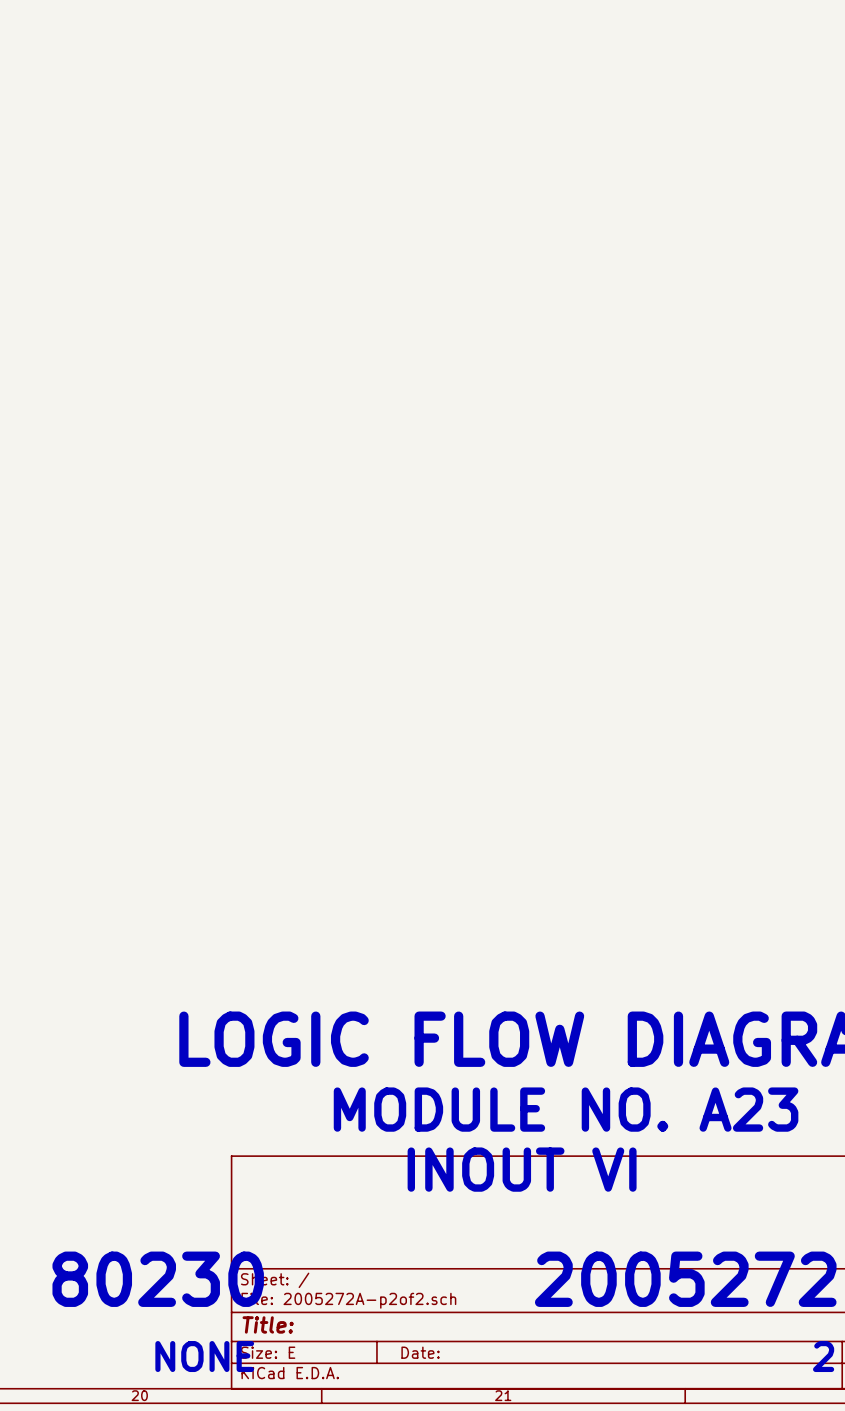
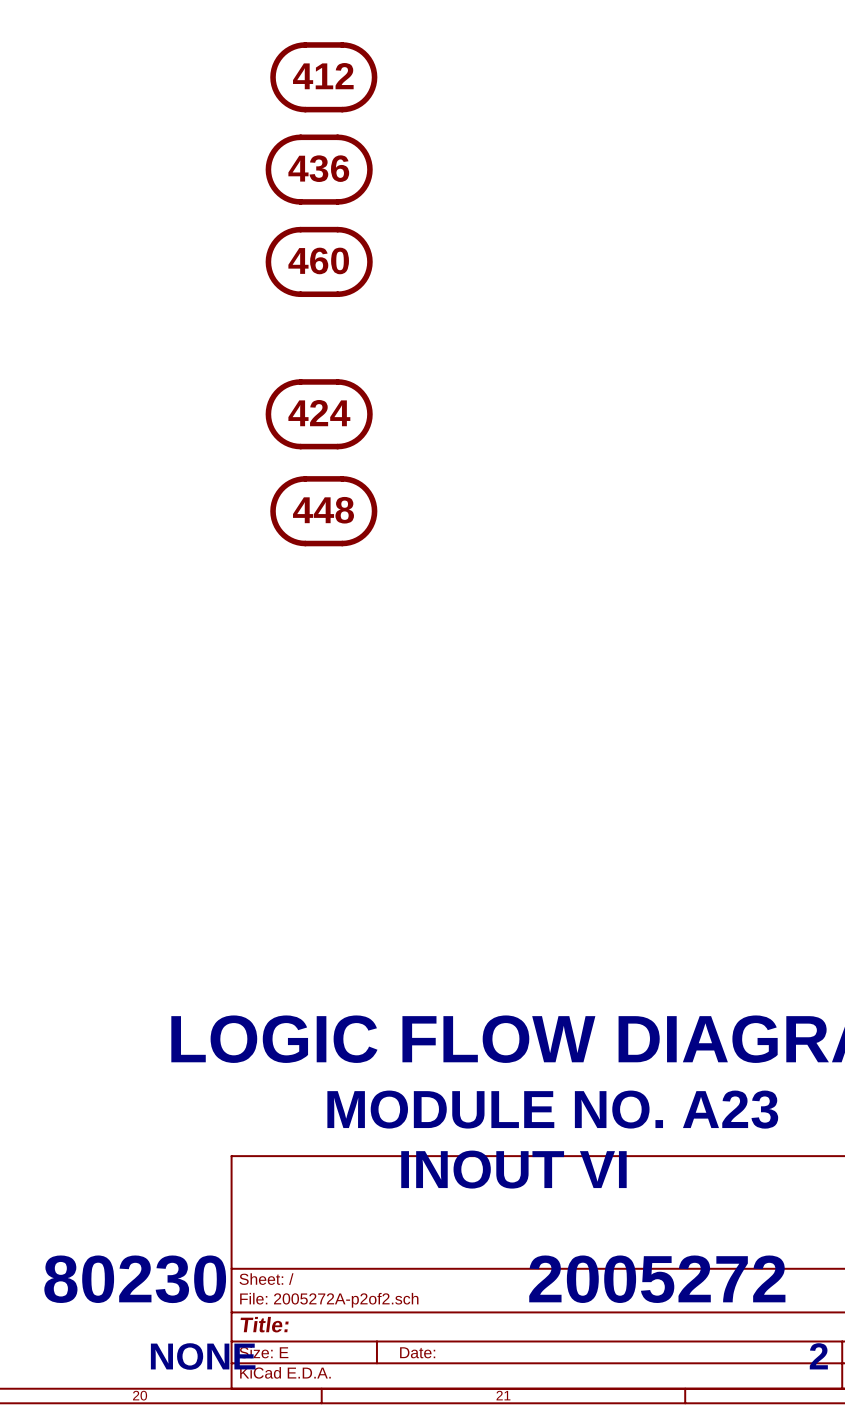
part: none -> (323, 77)
part: none -> (319, 169)
part: none -> (319, 261)
part: none -> (319, 414)
part: none -> (323, 511)

